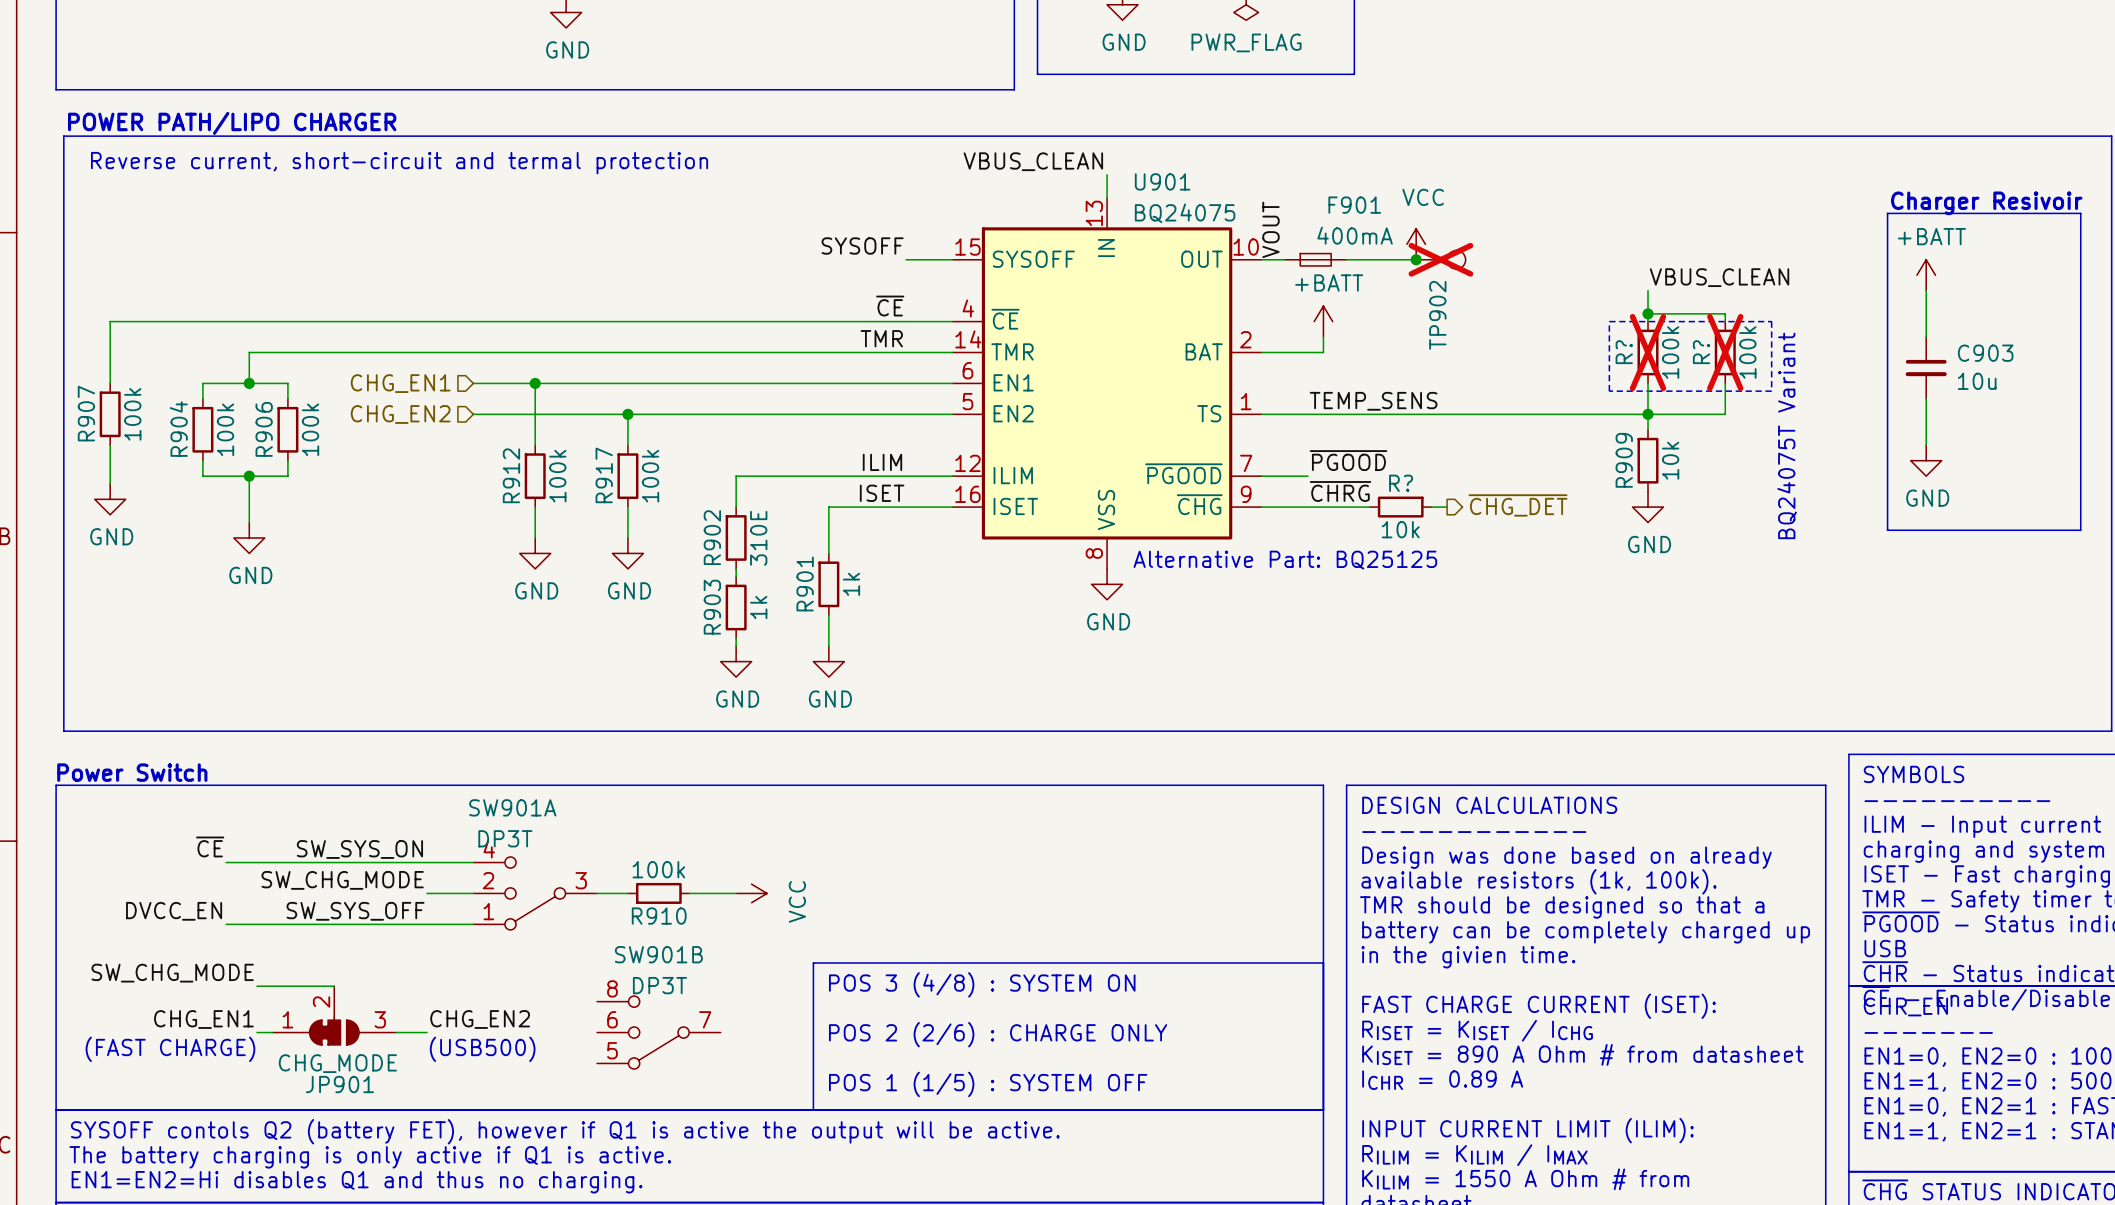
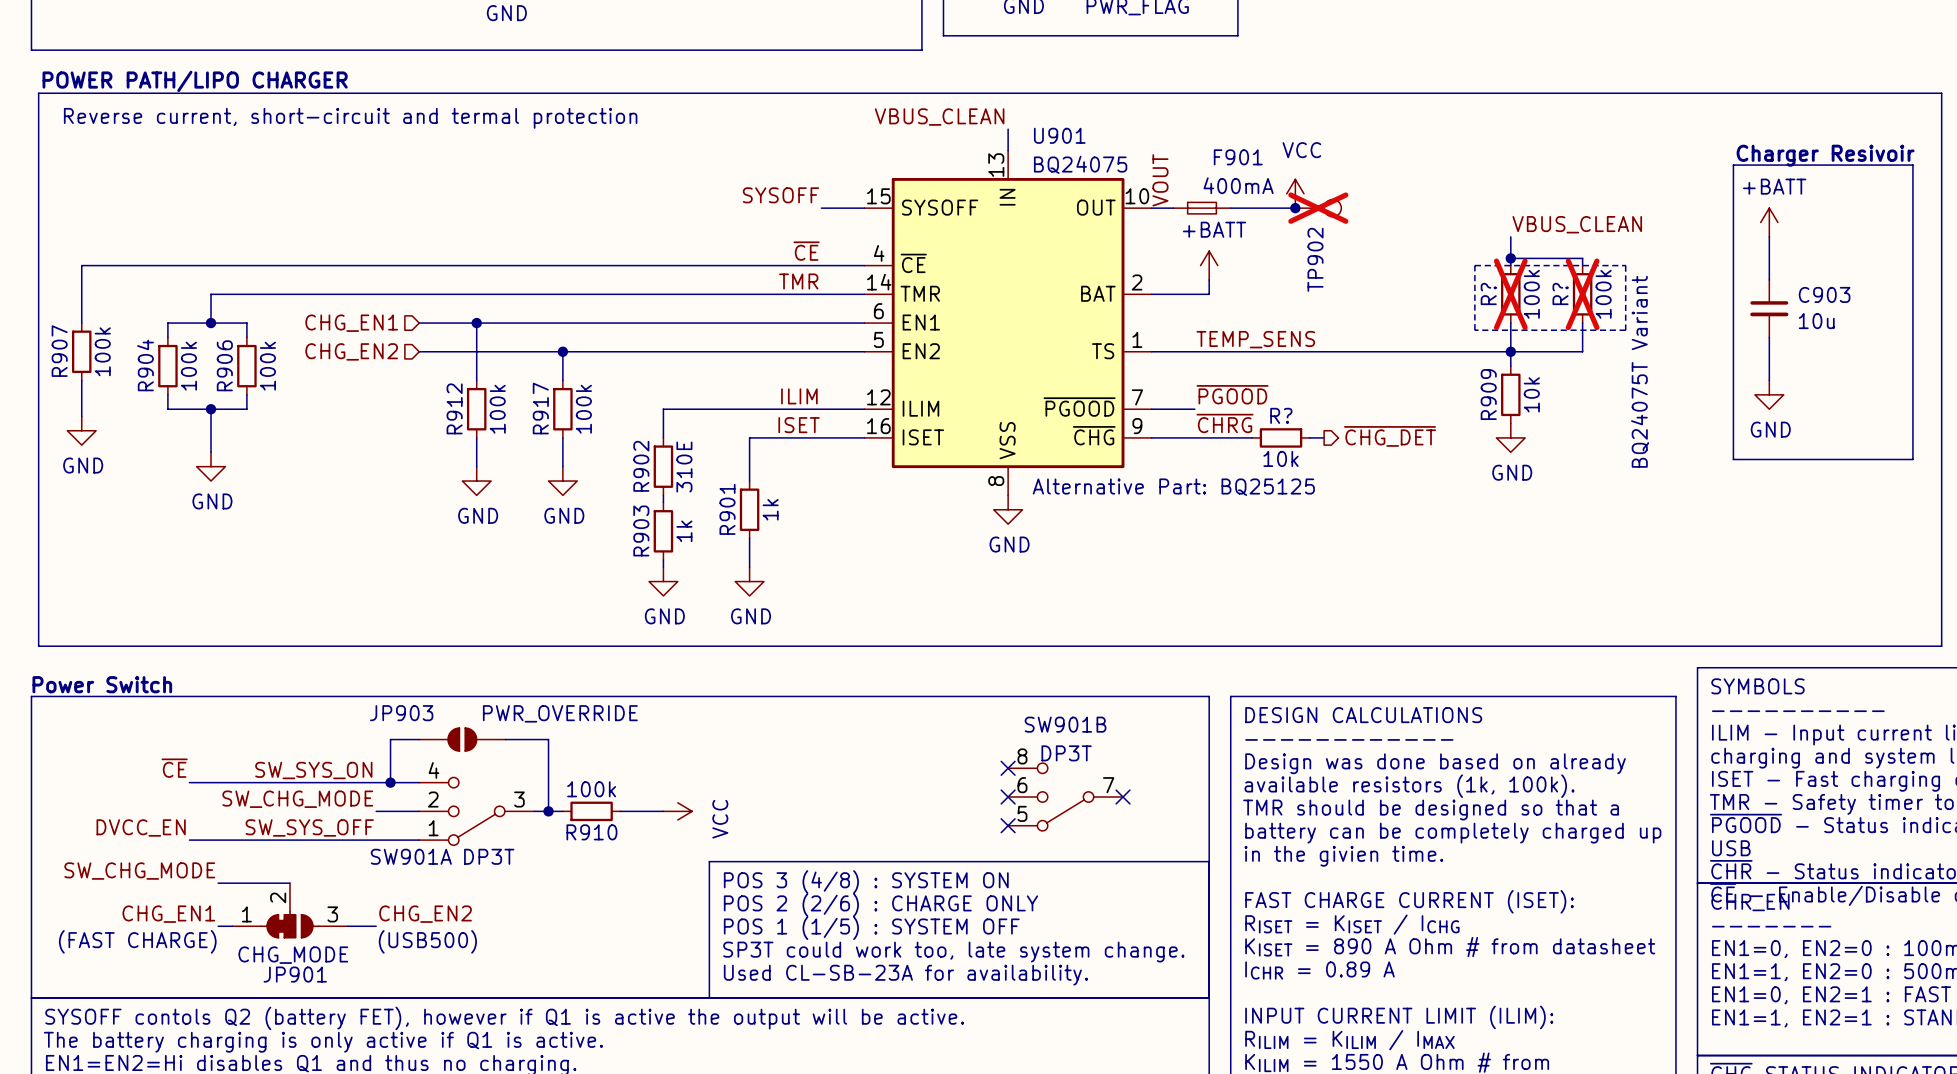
SW901A name position: SW901A (512, 807) -> SW901A (411, 856)
wire: none -> (419, 739) (390, 739) (390, 782)
JP903: none -> PWR_OVERRIDE (462, 739)
wire: none -> (505, 739) (548, 739) (548, 811)
SW901A value position: DP3T (505, 838) -> DP3T (489, 856)
label position: ~{CE} (210, 846) -> ~{CE} (174, 768)
label position: SW_SYS_ON (359, 849) -> SW_SYS_ON (313, 770)
wire: (226, 862) (473, 862) -> (189, 782) (419, 782)
no-connect mark: none -> (1008, 768)
junction: none -> (390, 782)
label position: SW_CHG_MODE (342, 880) -> SW_CHG_MODE (297, 799)
wire: (427, 893) (473, 893) -> (376, 811) (419, 811)
SW901A position: (535, 893) -> (476, 811)
wire: (597, 893) (627, 893) -> (534, 811) (562, 811)
R910 position: (658, 893) -> (591, 811)
wire: (689, 893) (736, 893) -> (620, 811) (663, 811)
power symbol position: VCC (751, 893) -> VCC (677, 811)
no-connect mark: none -> (1008, 797)
no-connect mark: none -> (1123, 797)
junction: none -> (548, 811)
label position: DVCC_EN (174, 911) -> DVCC_EN (141, 827)
label position: SW_SYS_OFF (355, 911) -> SW_SYS_OFF (309, 827)
wire: (226, 924) (473, 924) -> (189, 840) (419, 840)
no-connect mark: none -> (1008, 825)
line: (813, 963) (813, 1109) -> (735, 861) (709, 861) (709, 998)
text position: POS 3 (4/8) : SYSTEM ON (982, 984) -> POS 3 (4/8) : SYSTEM ON (866, 881)
SW901B position: (658, 1032) -> (1065, 797)
text position: POS 2 (2/6) : CHARGE ONLY (998, 1034) -> POS 2 (2/6) : CHARGE ONLY (880, 905)
text: none -> SP3T could work too, late system change. (953, 952)
text position: POS 1 (1/5) : SYSTEM OFF (988, 1084) -> POS 1 (1/5) : SYSTEM OFF (871, 928)
text: none -> Used CL-SB-23A for availability. (905, 975)

